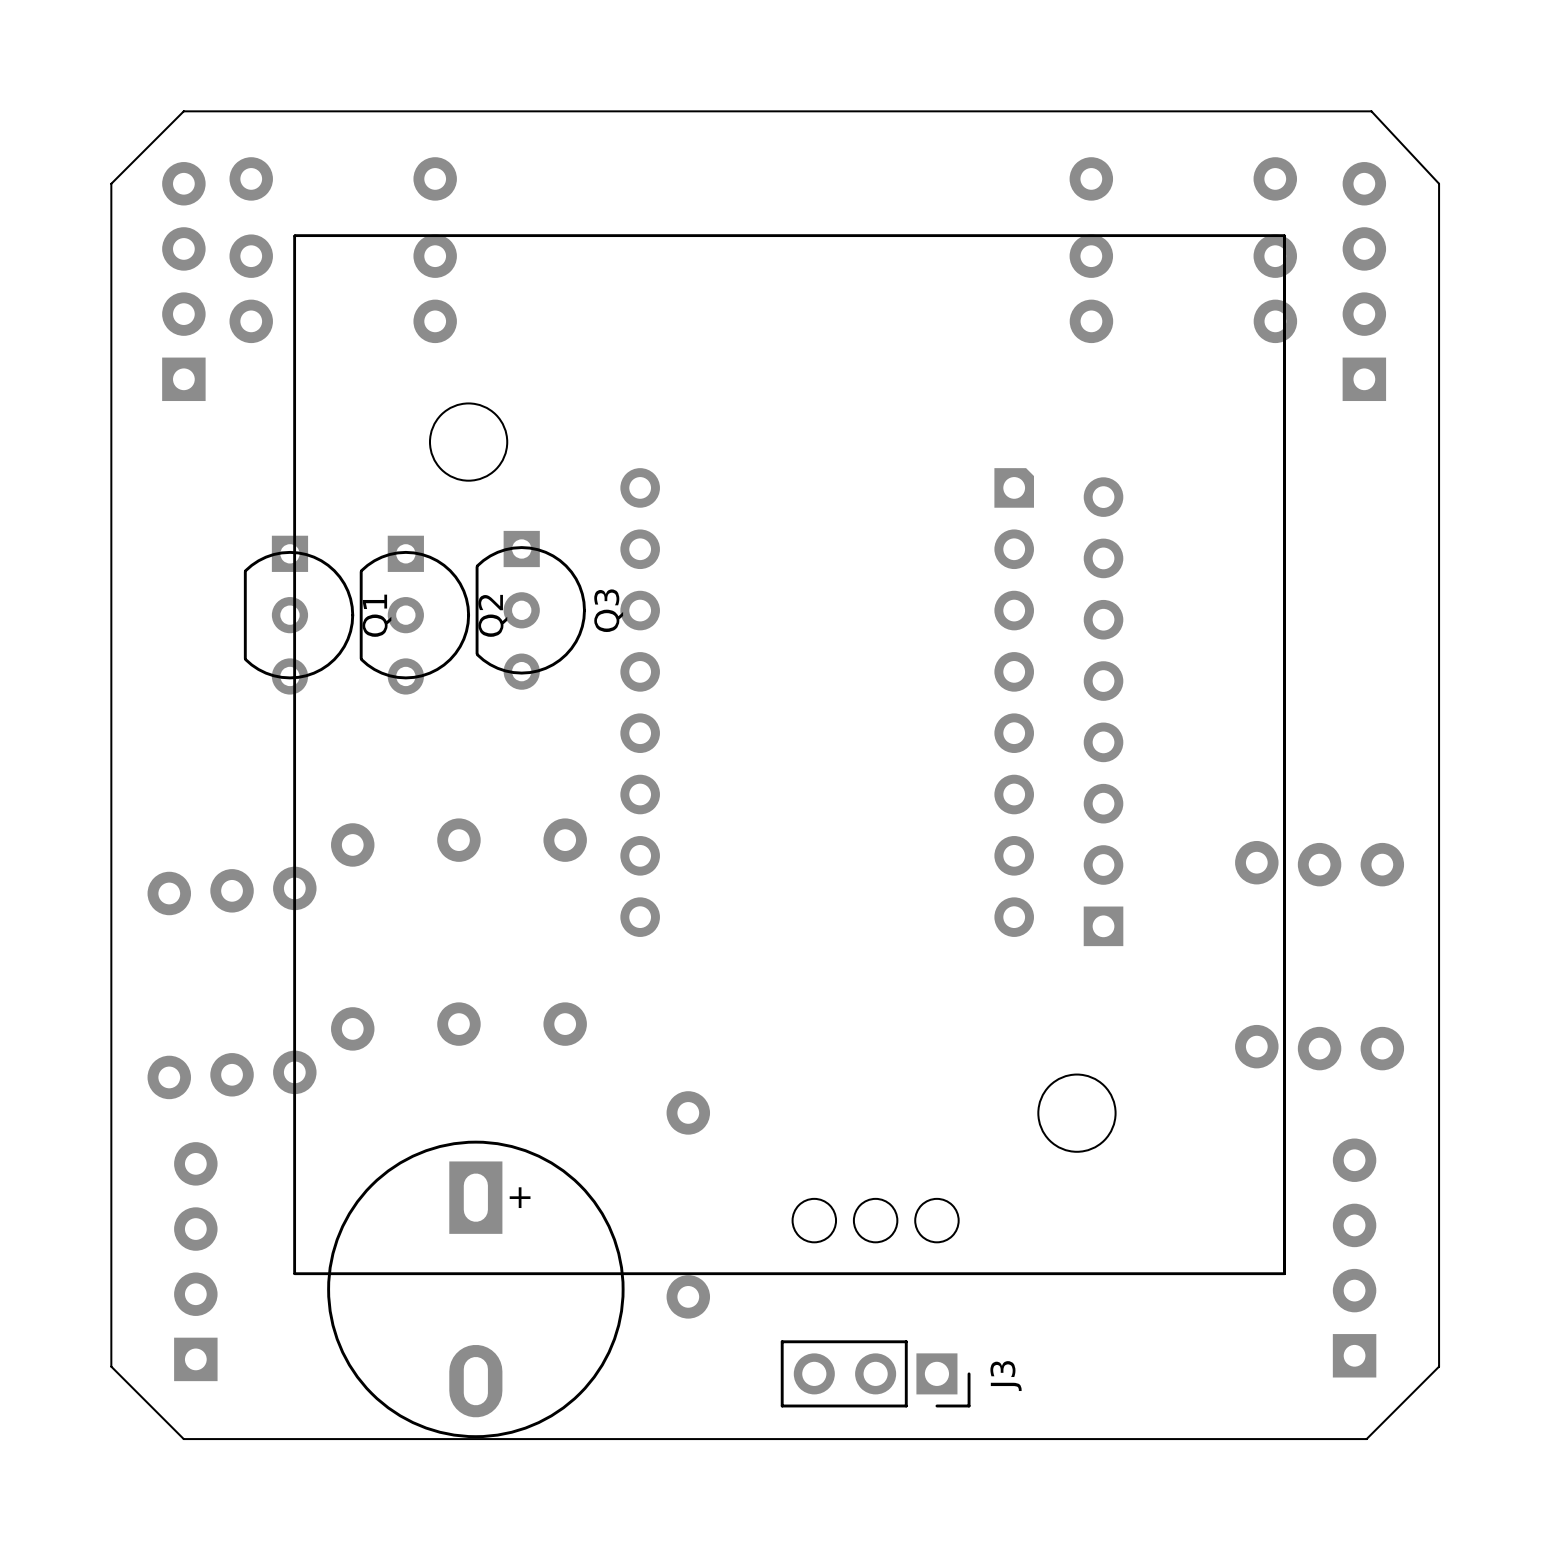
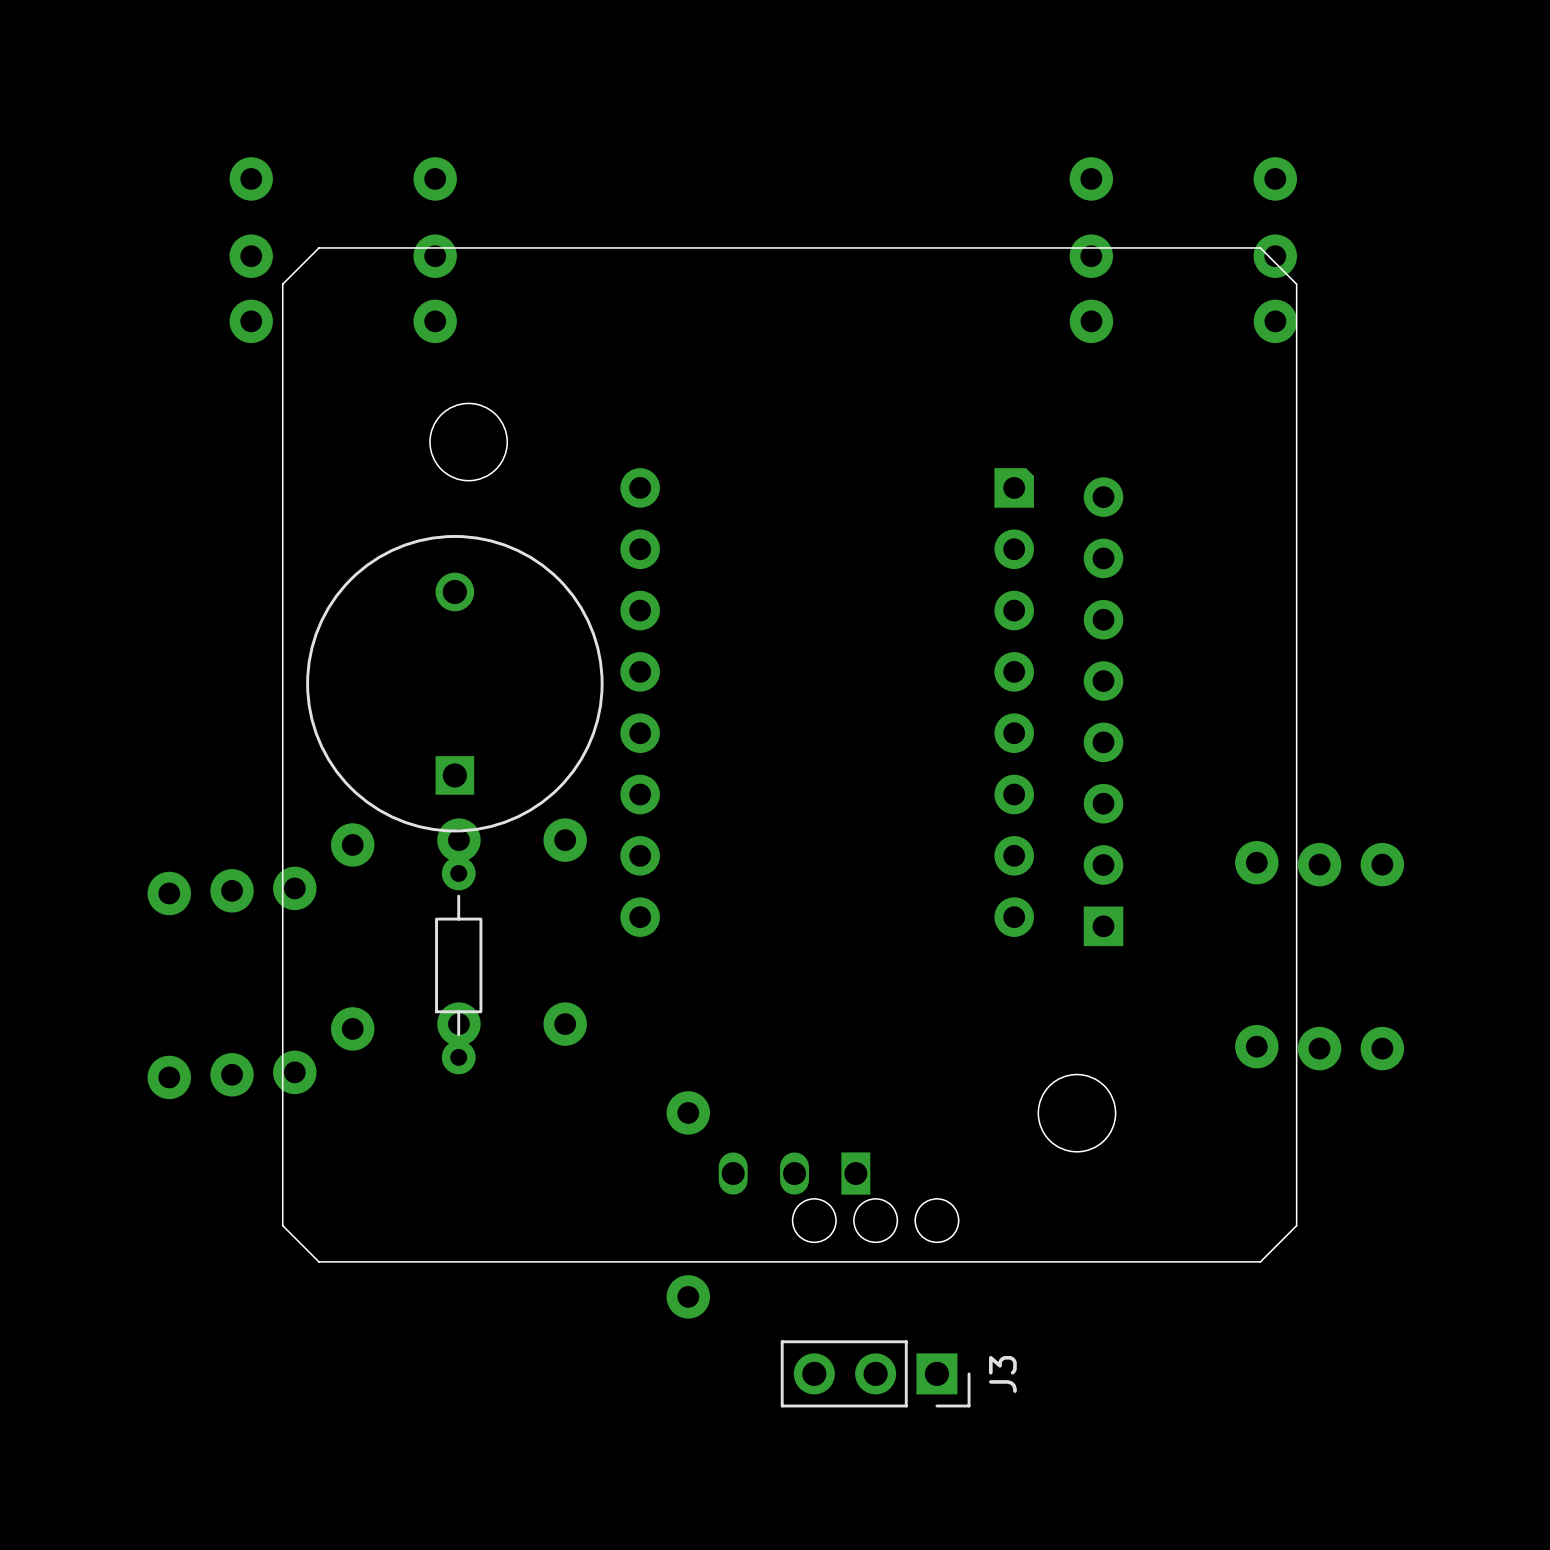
board edge: (183, 111) (111, 183) (111, 1366) (183, 1439) (1366, 1439) (1439, 1366) (1439, 183) (1371, 111) (183, 111) -> (318, 247) (282, 284) (282, 1225) (318, 1261) (1260, 1261) (1296, 1225) (1296, 284) (1260, 247) (318, 247)
part: (183, 281) -> none
part: (1364, 281) -> none
Q3: (530, 610) -> none
Q1: (299, 615) -> none
Q2: (414, 615) -> none
part: none -> (454, 683)
part: (789, 754) -> none
part: none -> (458, 965)
part: none -> (794, 1173)
part: (1354, 1258) -> none
part: (195, 1261) -> none
part: (475, 1289) -> none

